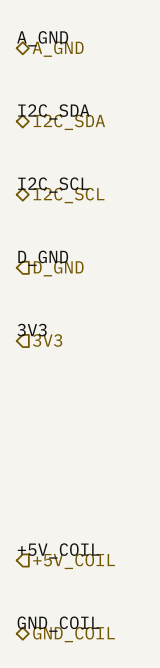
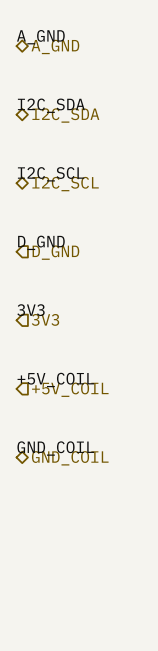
label position: +5V_COIL (58, 550) -> +5V_COIL (55, 379)
hierarchical label position: +5V_COIL (74, 561) -> +5V_COIL (70, 389)
label position: GND_COIL (58, 624) -> GND_COIL (55, 448)
hierarchical label position: GND_COIL (74, 634) -> GND_COIL (70, 458)

